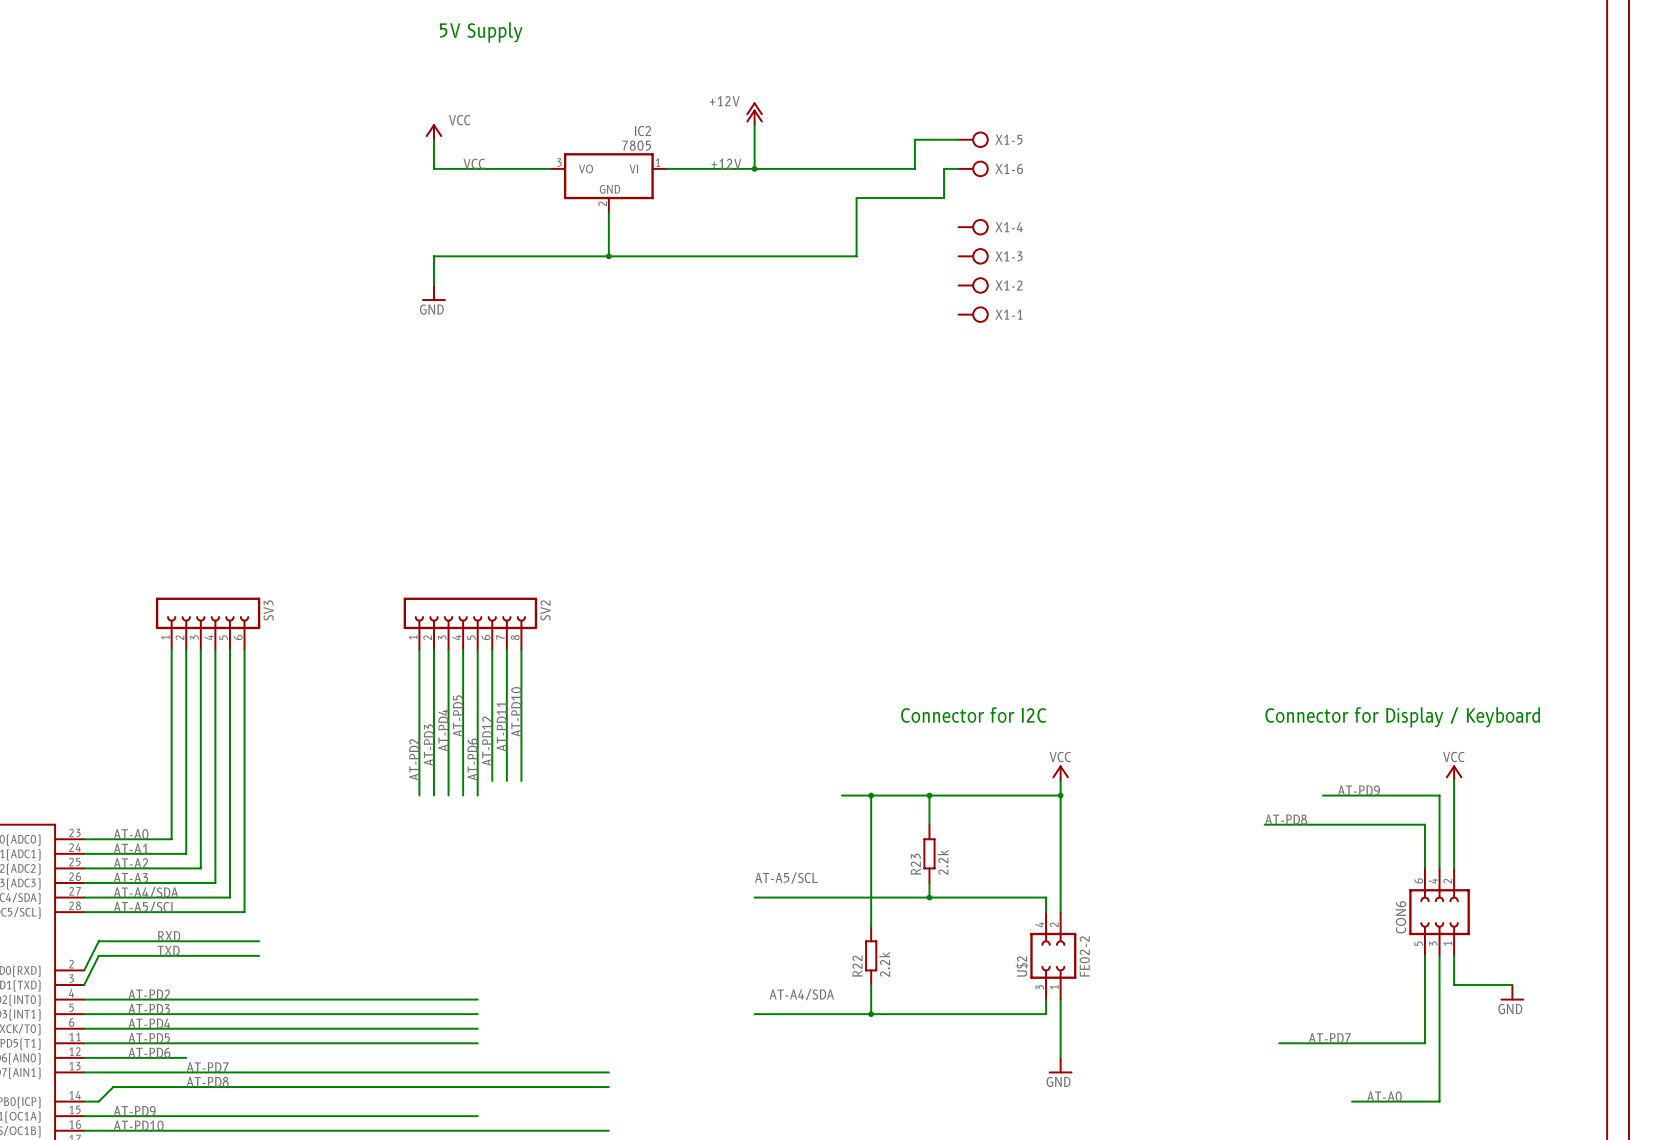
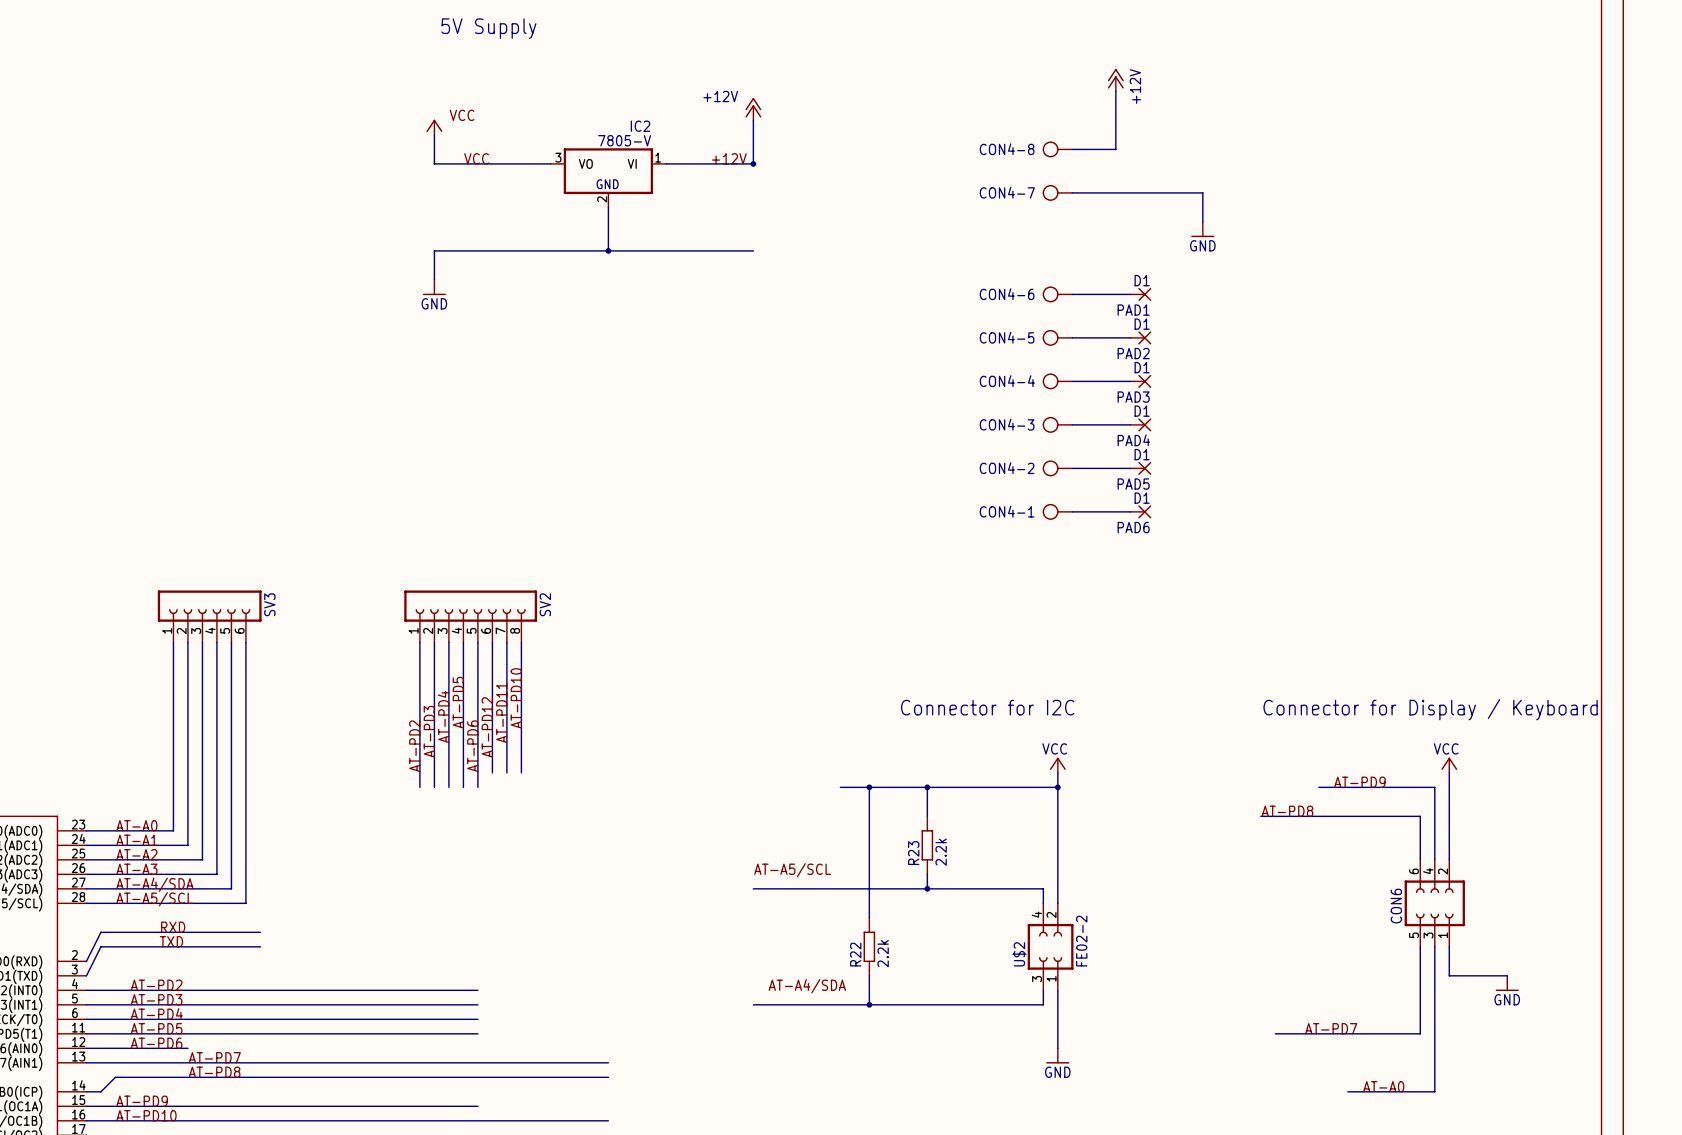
power symbol: none -> +12V (1115, 80)
wire: none -> (1115, 91) (1115, 149) (1072, 149)
wire: (958, 139) (914, 139) (914, 168) (754, 168) -> none
X1-5: (973, 139) -> none
IC2 value: 7805 (636, 145) -> 7805-V (624, 140)
CON4-8: none -> (1057, 149)
wire: (958, 168) (944, 168) (944, 198) (856, 198) (856, 256) (754, 256) -> none
X1-6: (973, 168) -> none
CON4-7: none -> (1057, 192)
wire: none -> (1072, 192) (1202, 192) (1202, 221)
X1-4: (973, 227) -> none
power symbol: none -> GND (1202, 229)
X1-3: (973, 256) -> none
X1-2: (973, 285) -> none
CON4-6: none -> (1057, 294)
wire: none -> (1072, 294) (1130, 294)
PAD1: none -> D1 (1140, 294)
X1-1: (973, 314) -> none
CON4-5: none -> (1057, 337)
wire: none -> (1072, 337) (1130, 337)
PAD2: none -> D1 (1140, 337)
CON4-4: none -> (1057, 381)
wire: none -> (1072, 381) (1130, 381)
PAD3: none -> D1 (1140, 381)
CON4-3: none -> (1057, 424)
wire: none -> (1072, 424) (1130, 424)
PAD4: none -> D1 (1140, 424)
CON4-2: none -> (1057, 468)
wire: none -> (1072, 468) (1130, 468)
PAD5: none -> D1 (1140, 468)
CON4-1: none -> (1057, 511)
wire: none -> (1072, 511) (1130, 511)
PAD6: none -> D1 (1140, 511)

